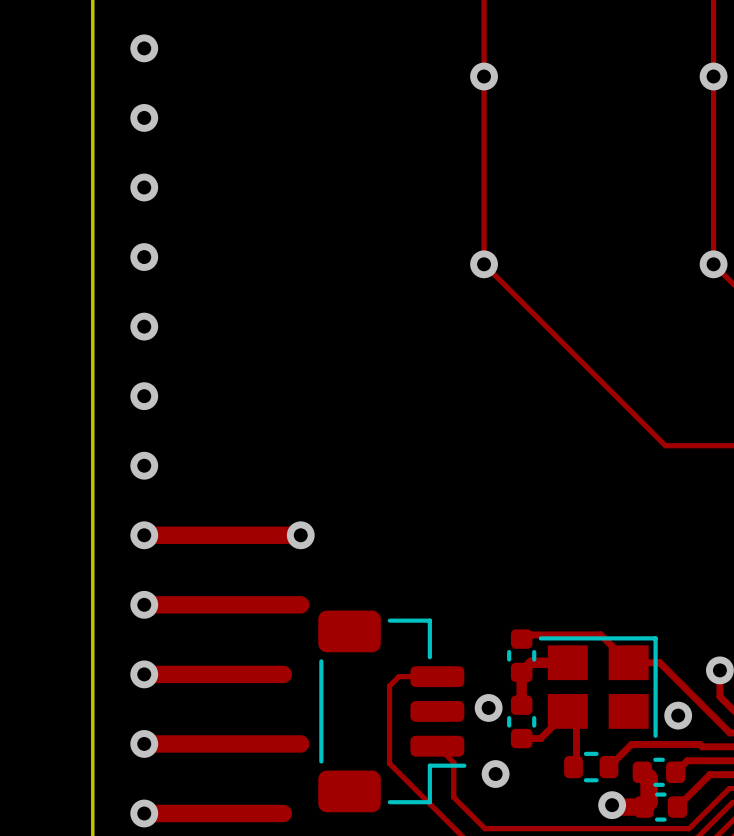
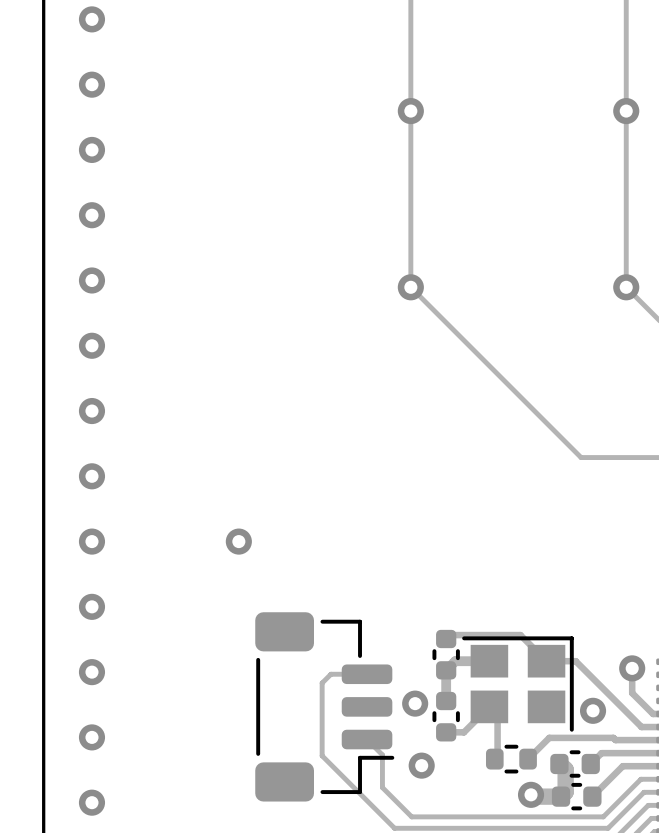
track: (144, 535) (300, 535) -> none
track: (144, 604) (300, 604) -> none
track: (144, 674) (283, 674) -> none
track: (144, 743) (300, 743) -> none
track: (144, 813) (283, 813) -> none

